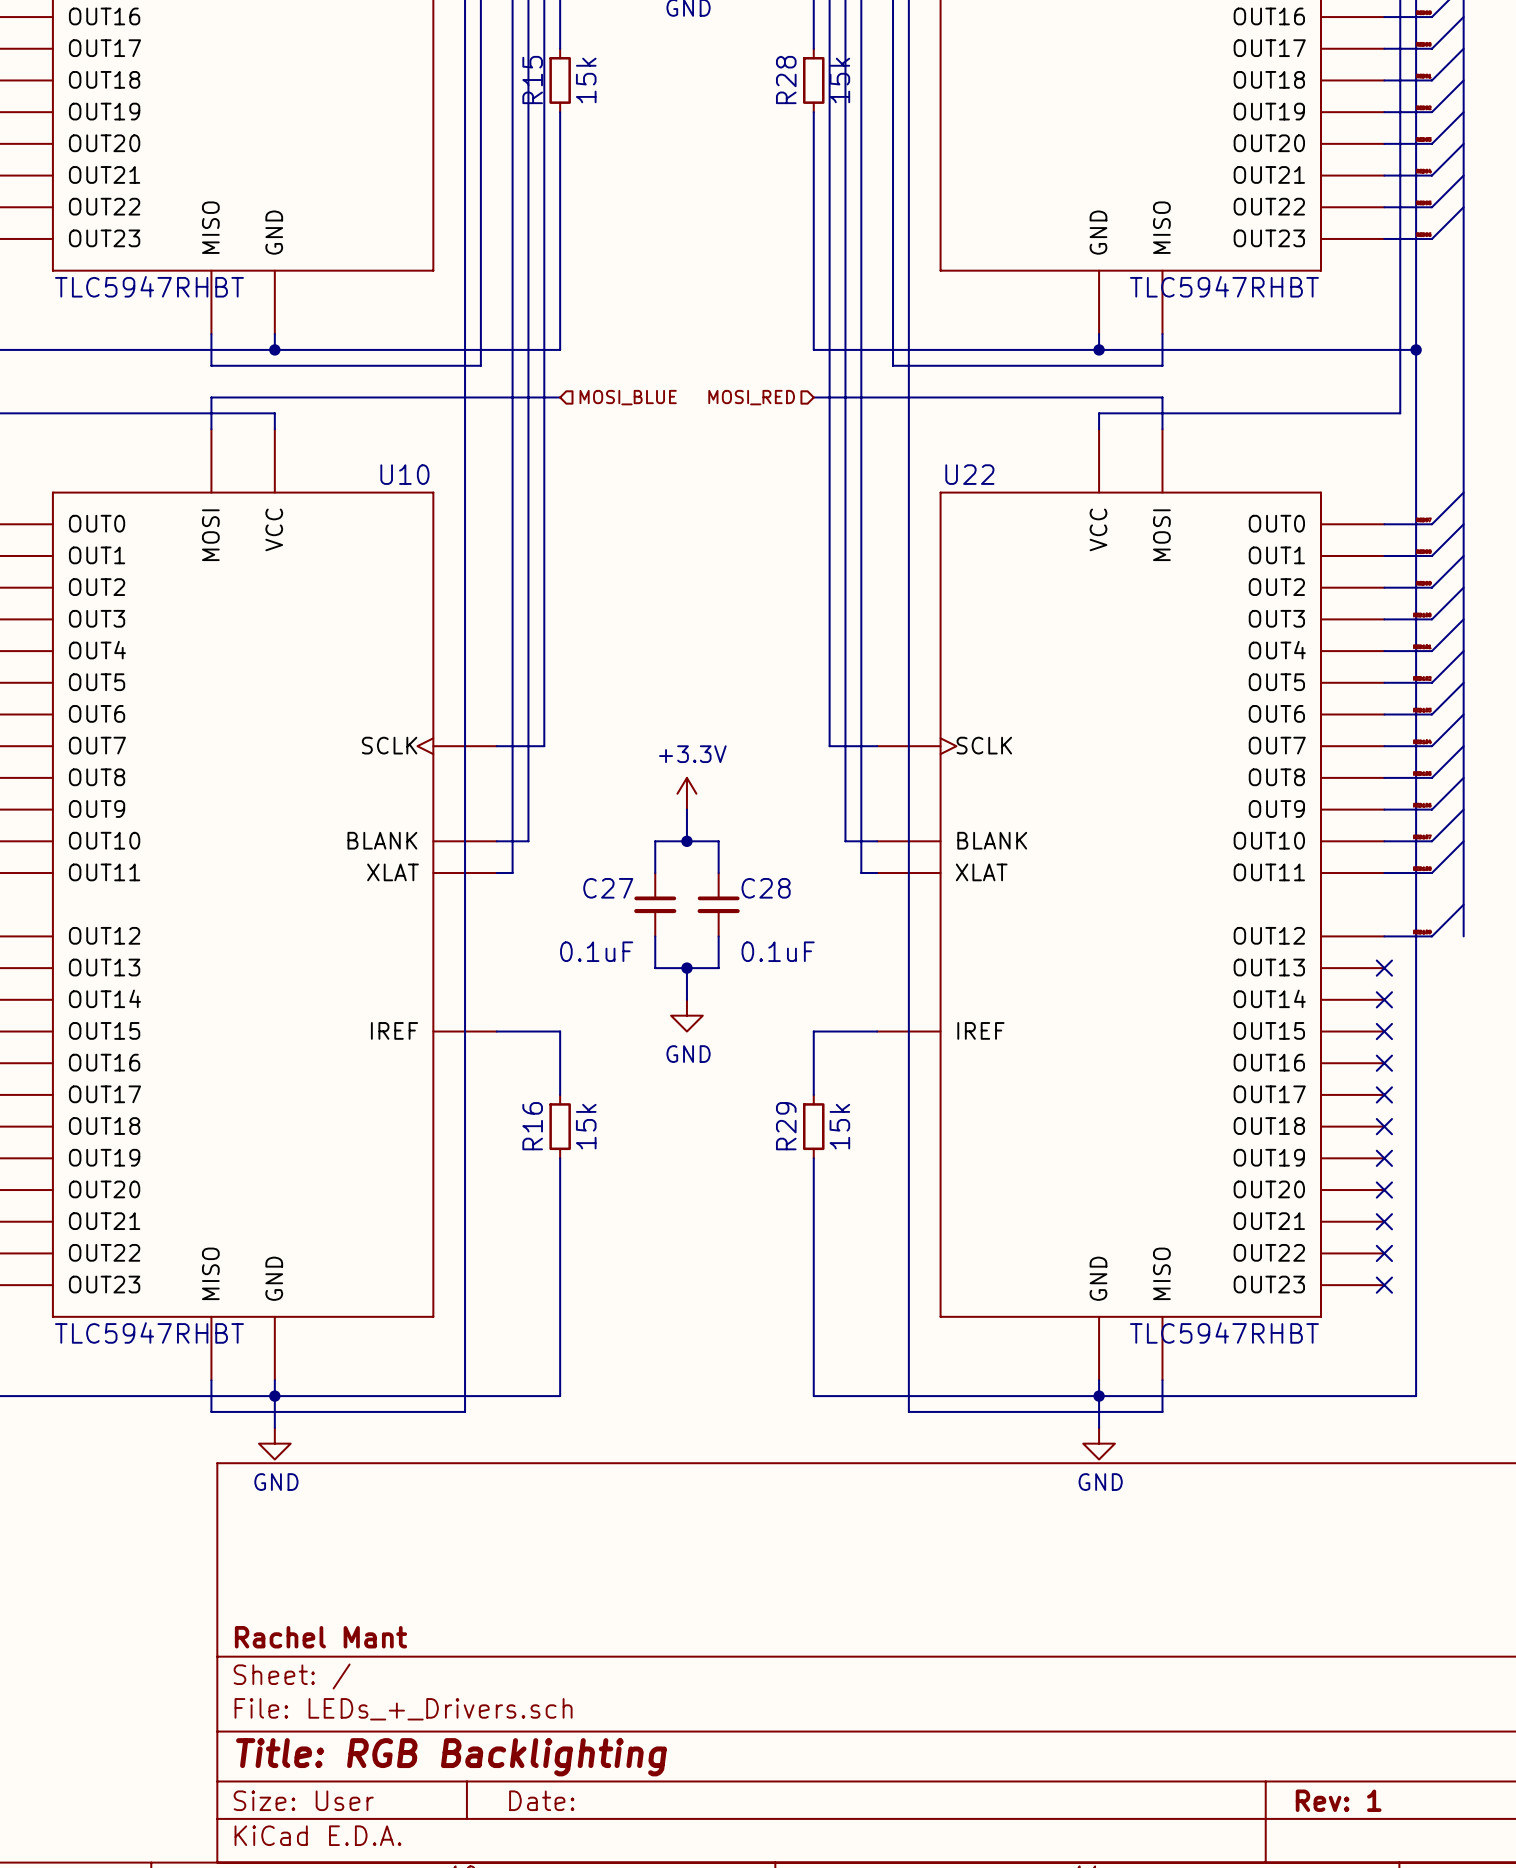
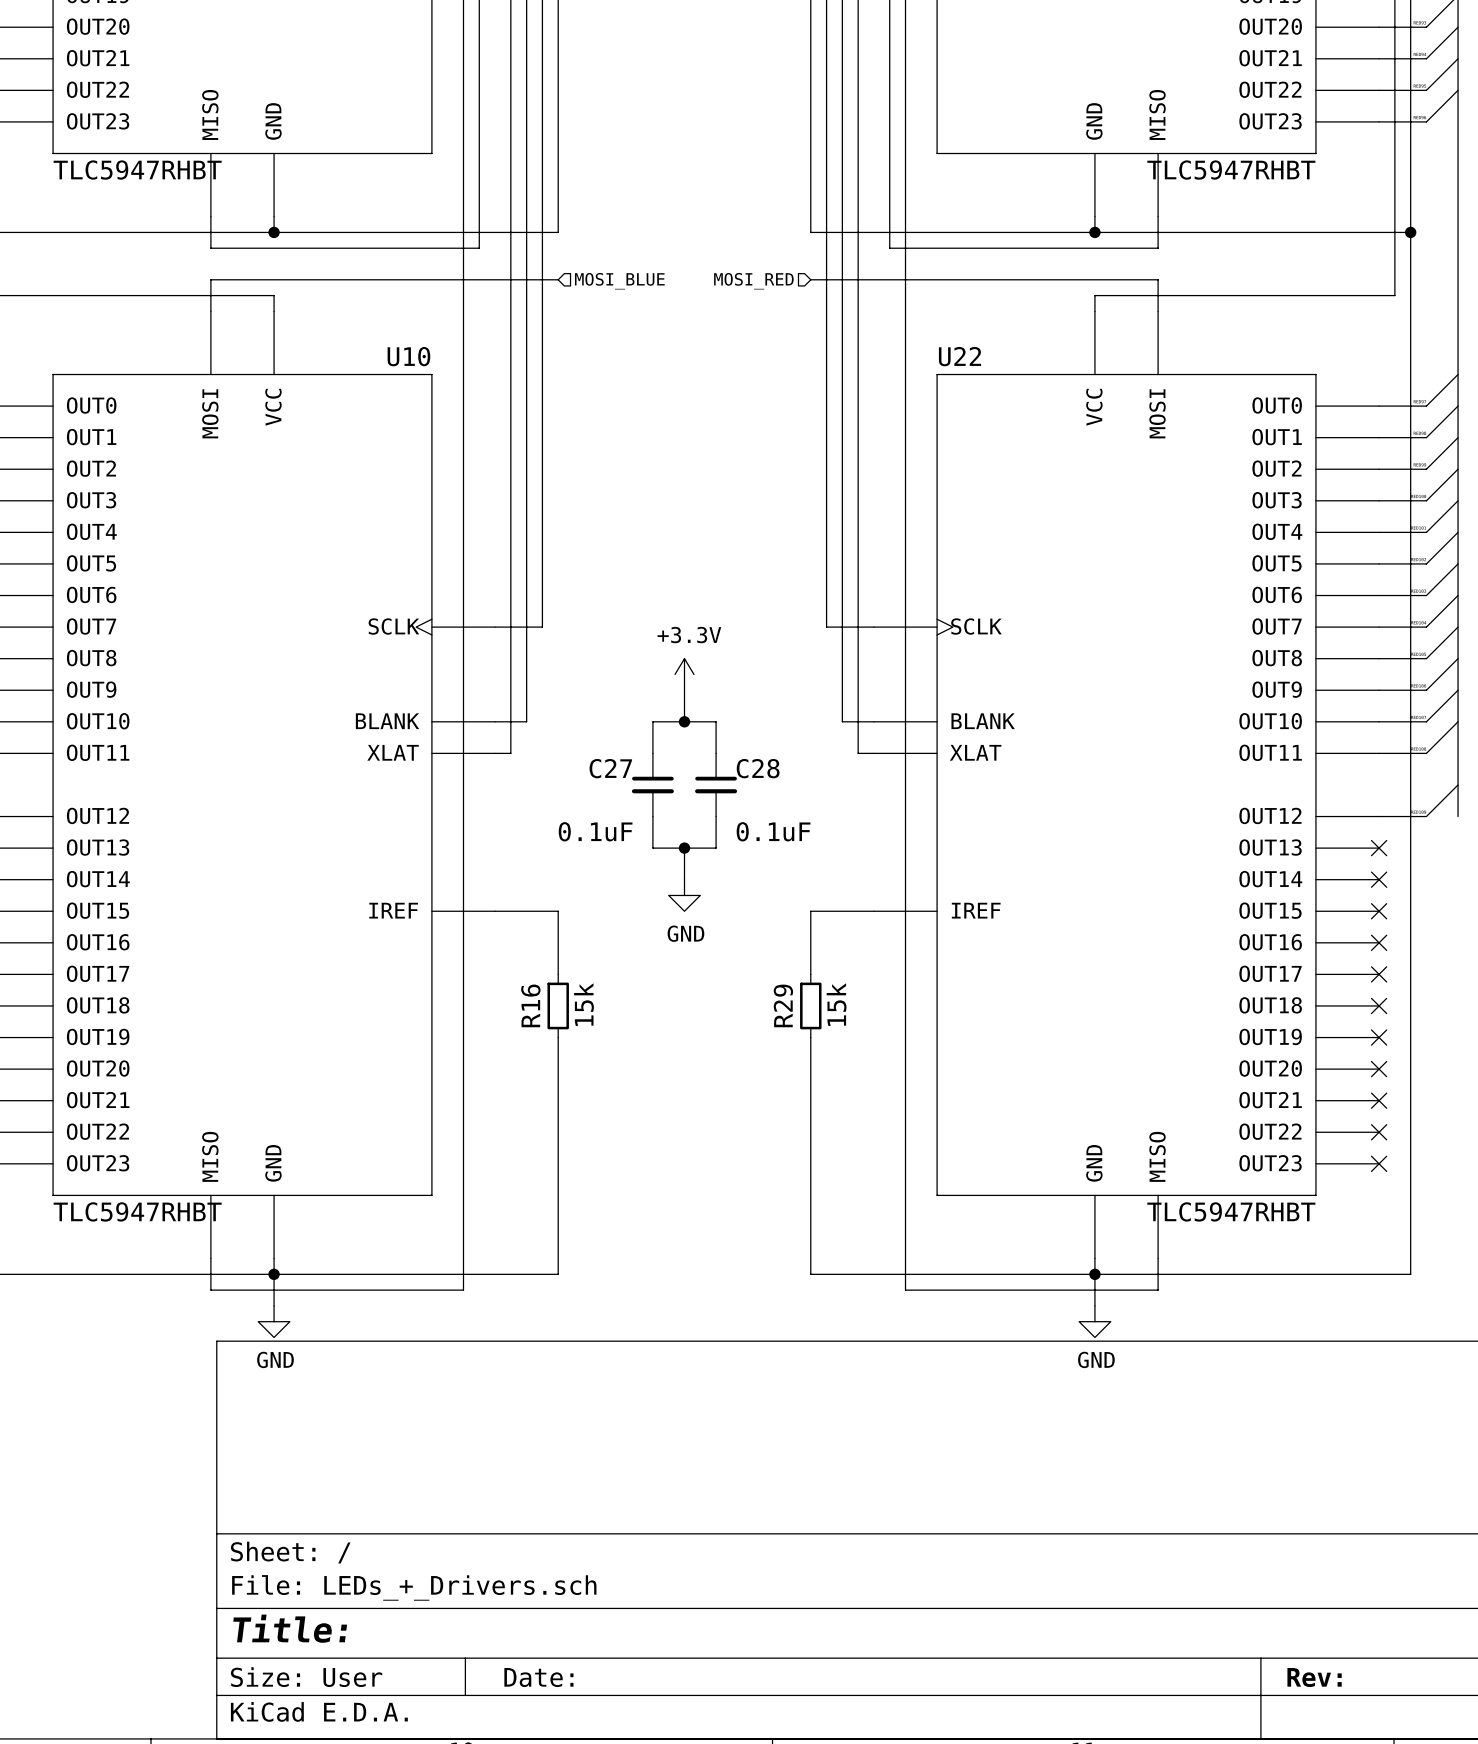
title block: Rachel Mant (320, 1637) -> none
title block: Title: RGB Backlighting (451, 1757) -> Title: (290, 1628)
title block: Rev: 1 (1338, 1800) -> Rev: (1314, 1677)

